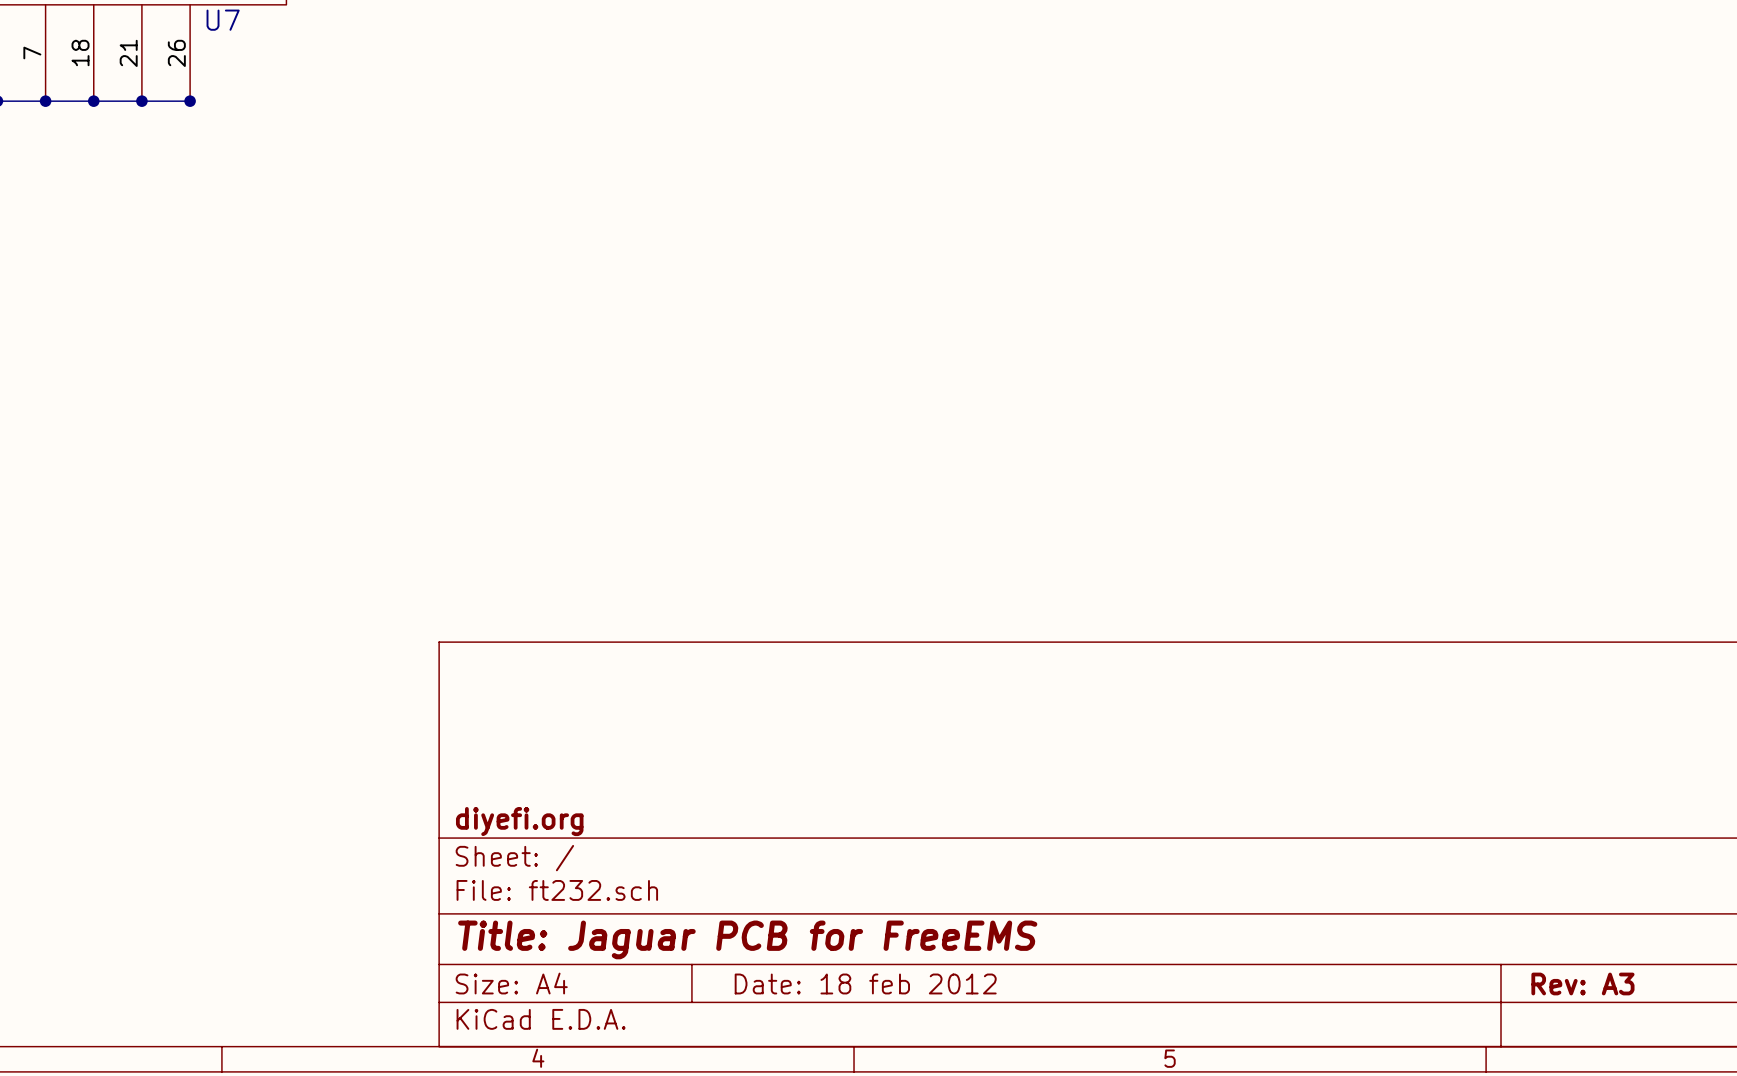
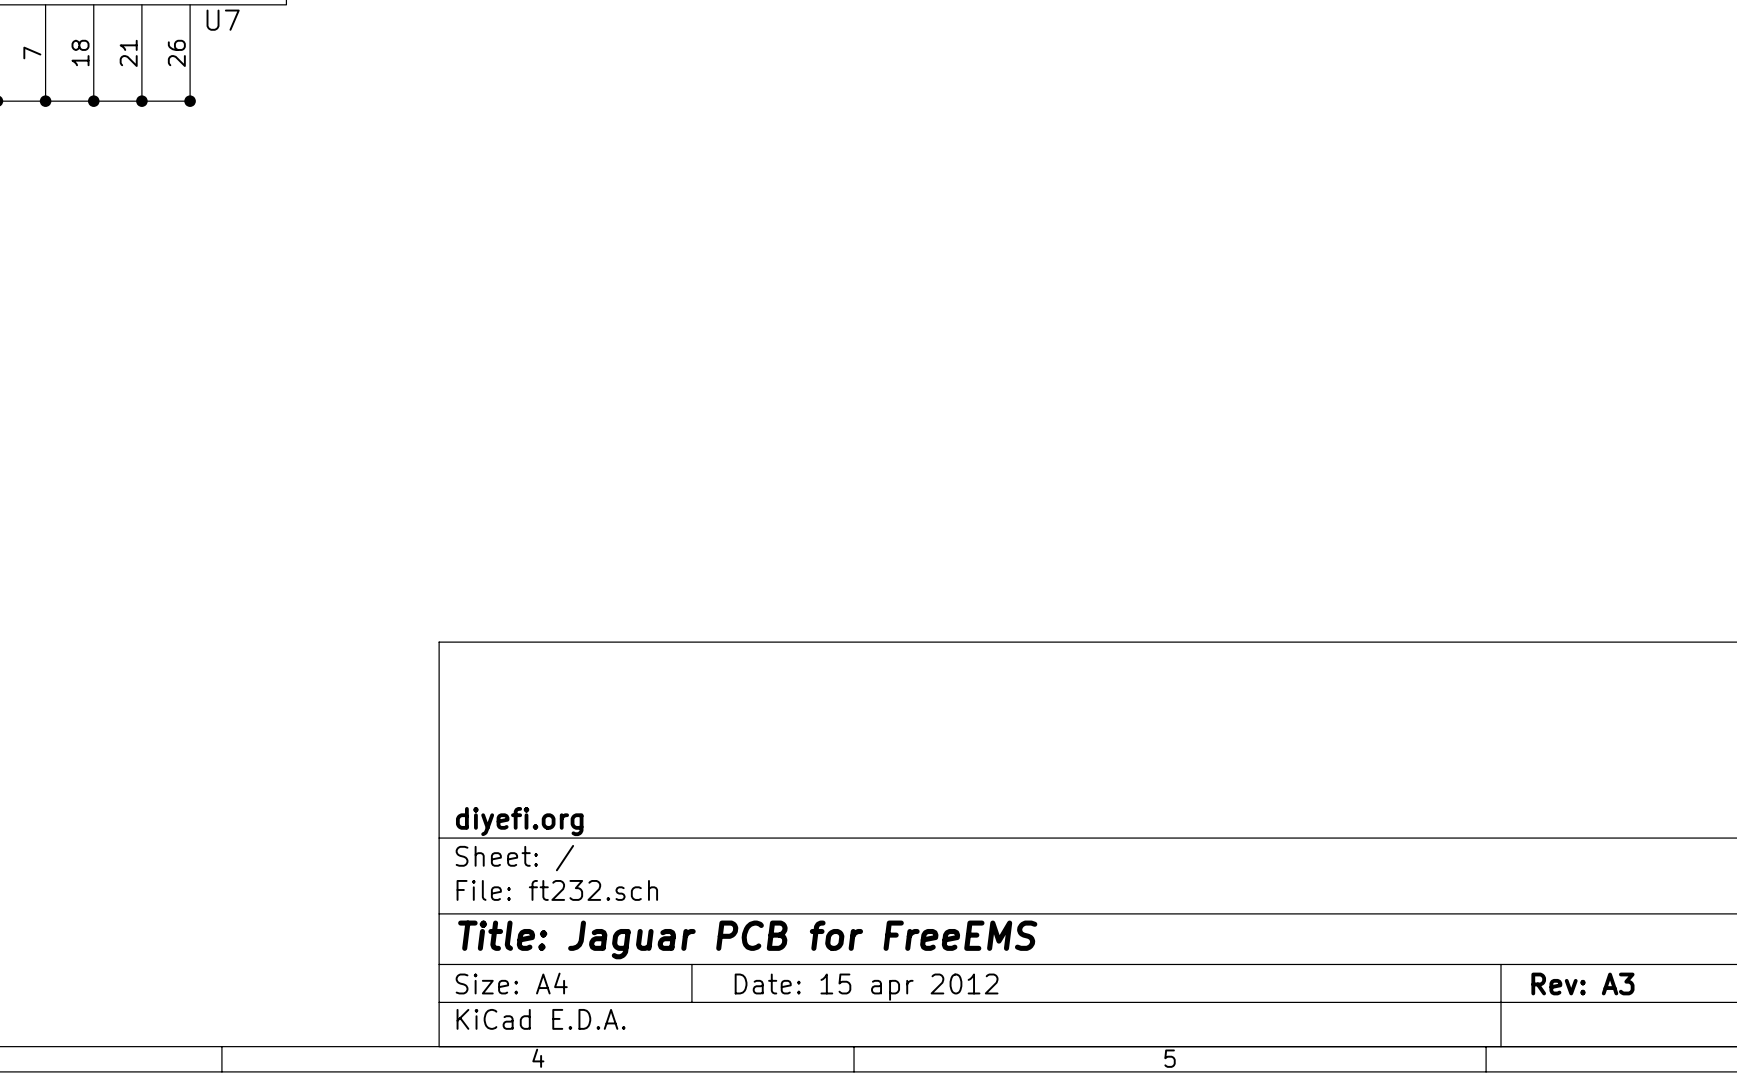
title block: Date: 18 feb 2012 (865, 983) -> Date: 15 apr 2012 (866, 987)

